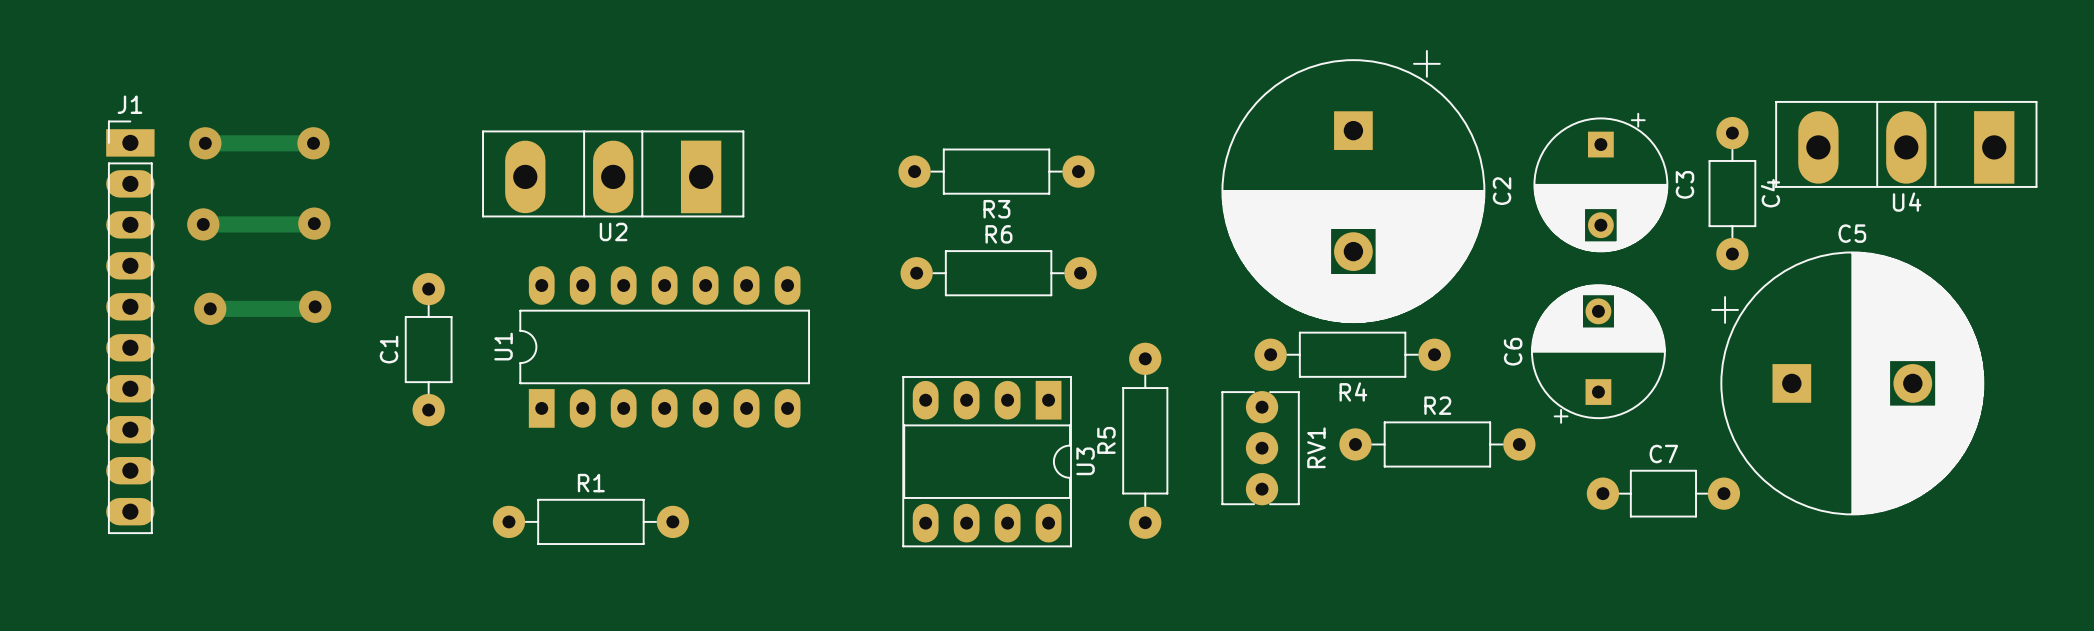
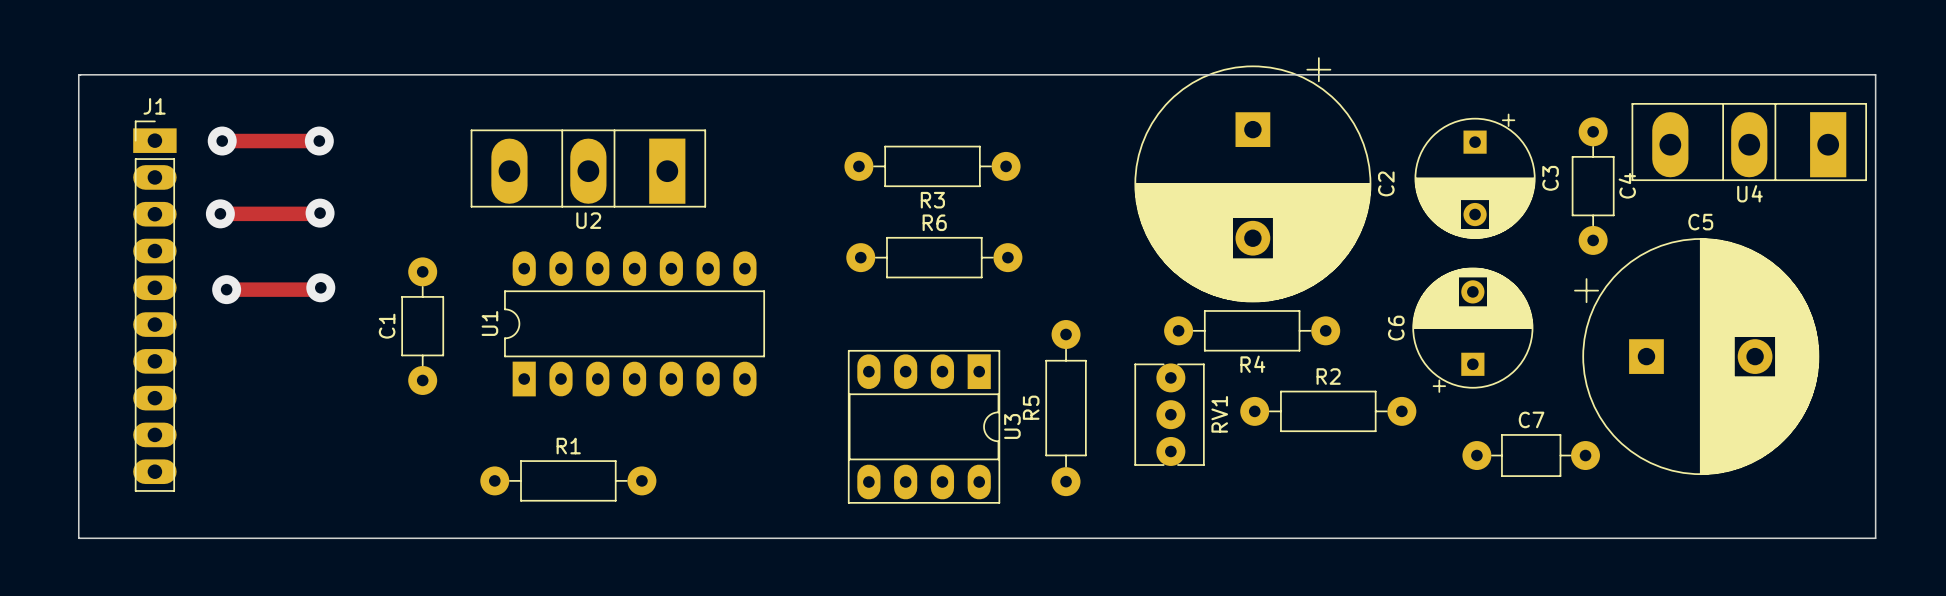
board edge: none -> (78, 74) (1875, 74) (1875, 538) (78, 538) (78, 74)

